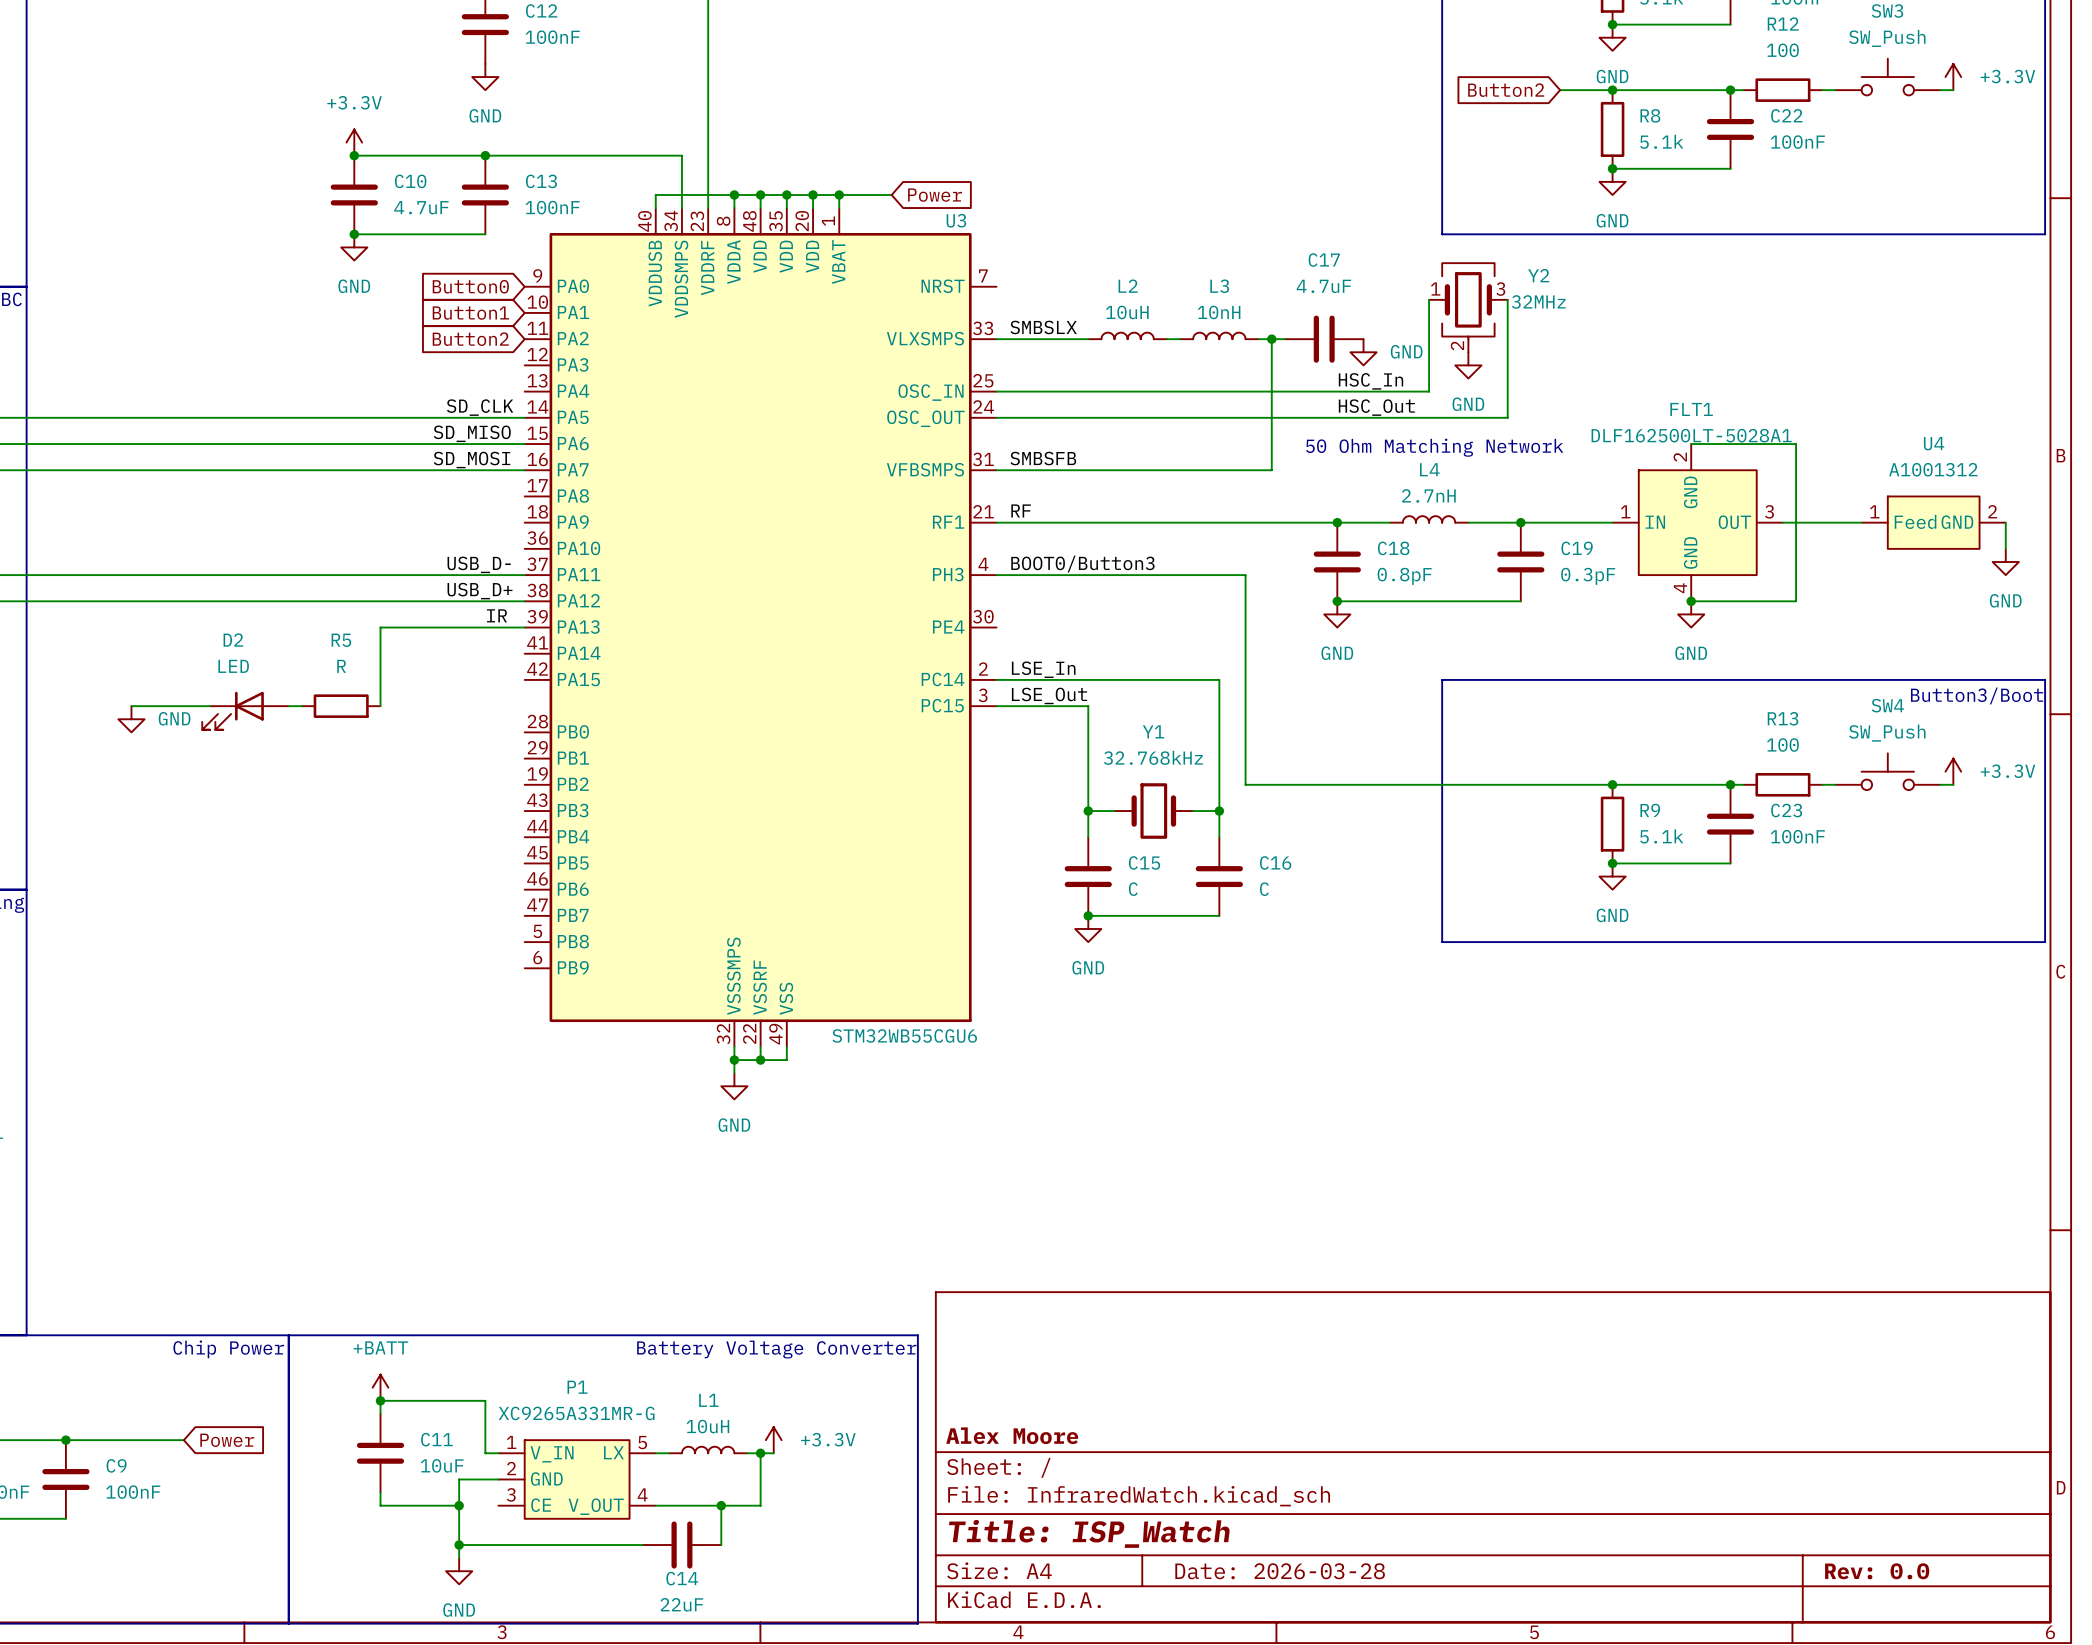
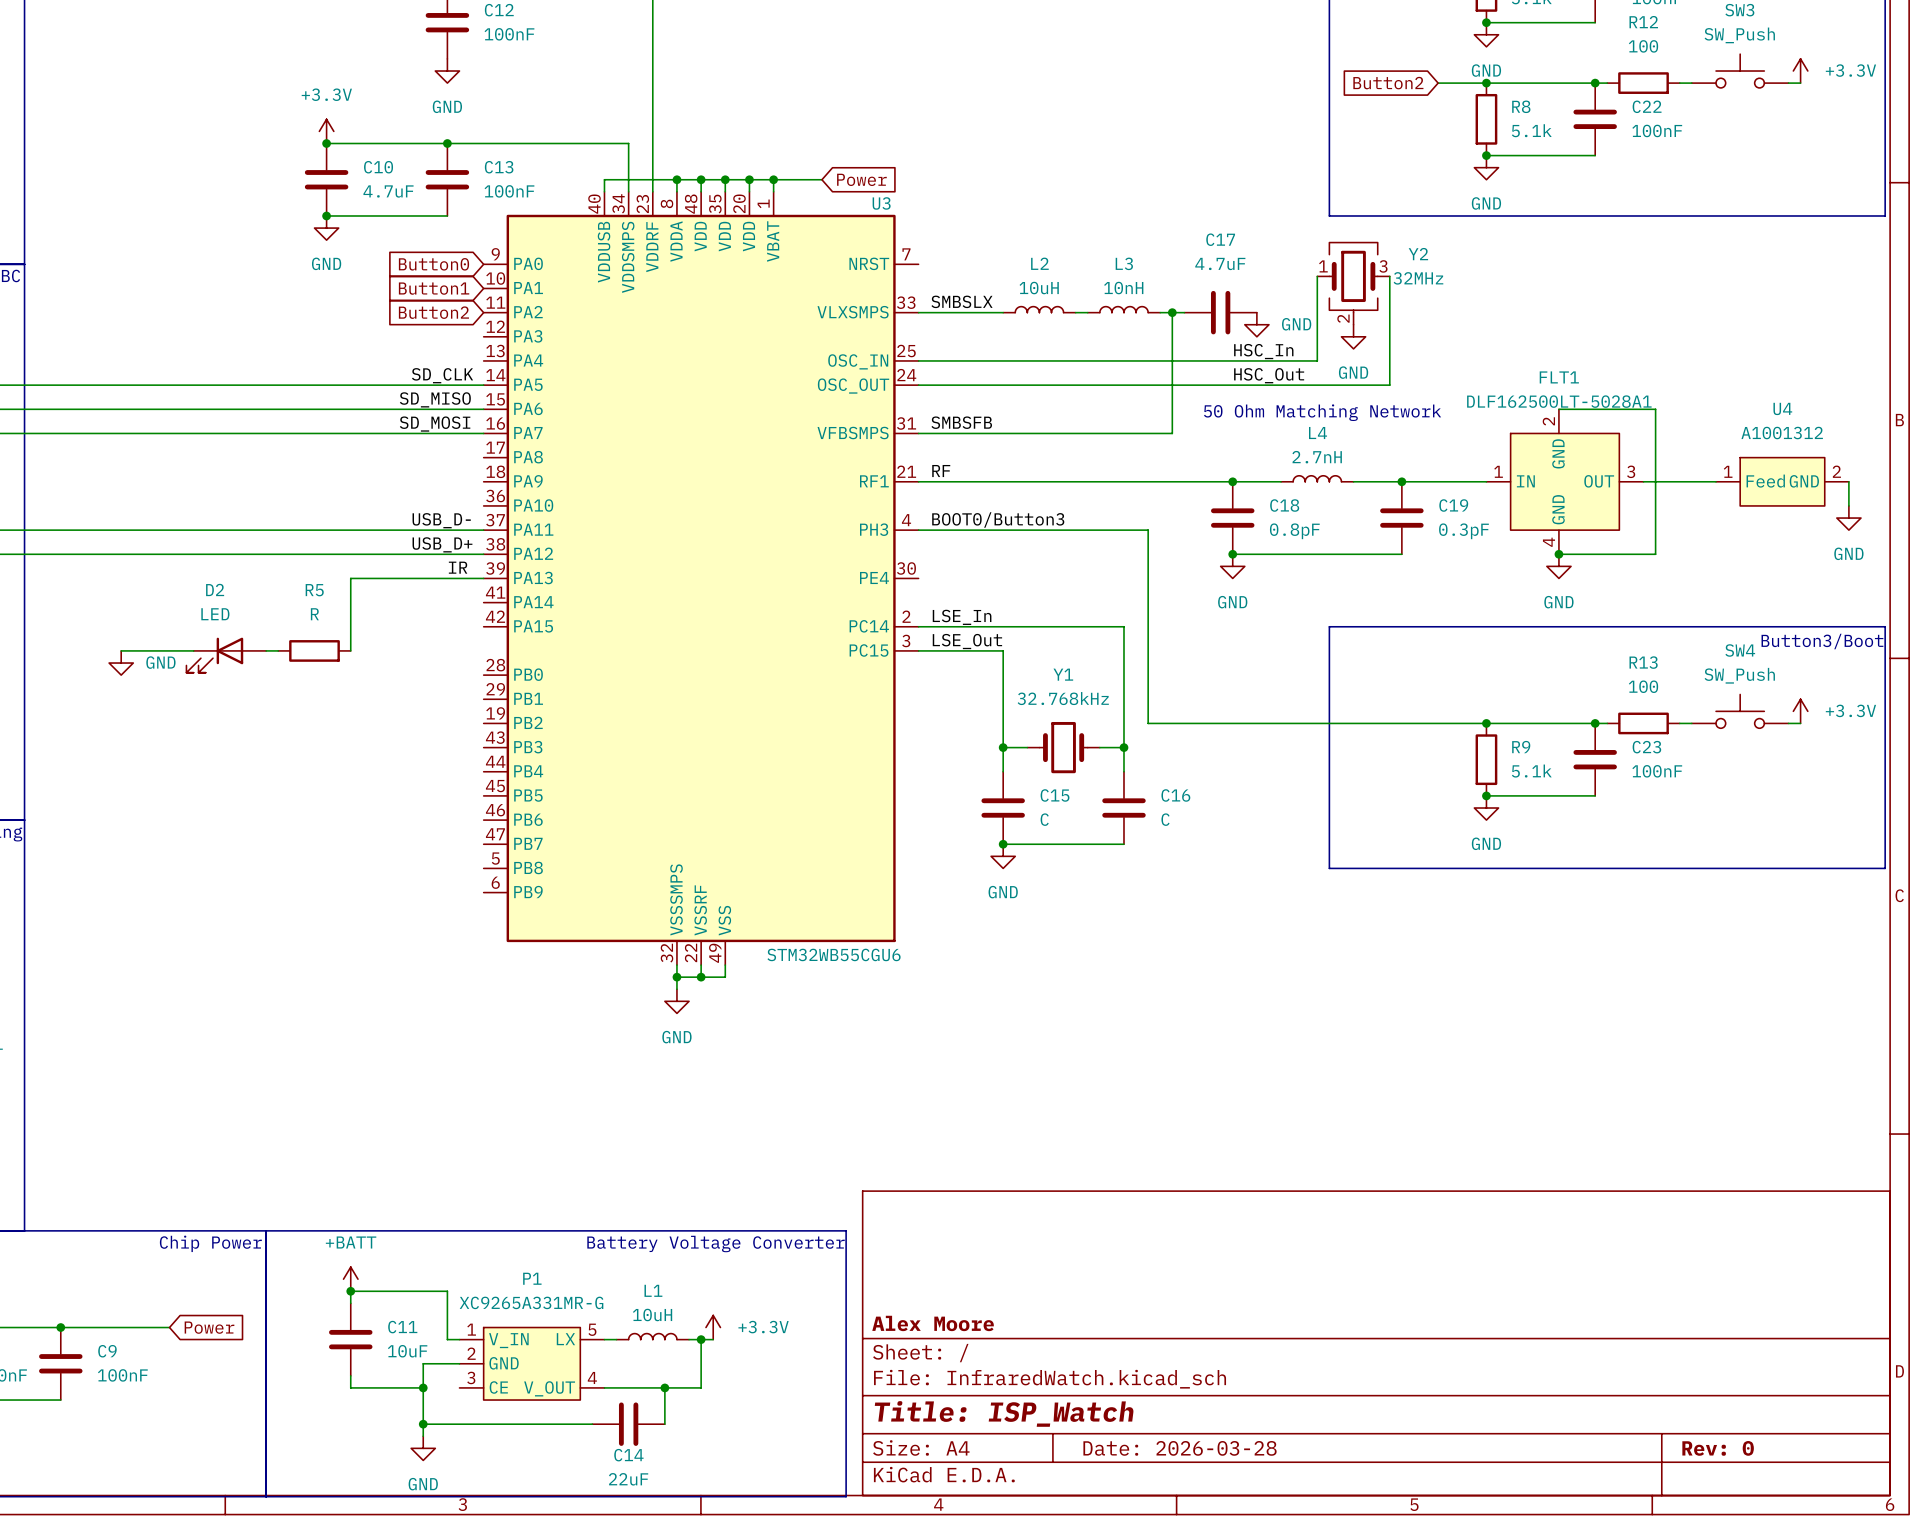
title block: Rev: 0.0 (1877, 1571) -> Rev: 0 (1718, 1448)

